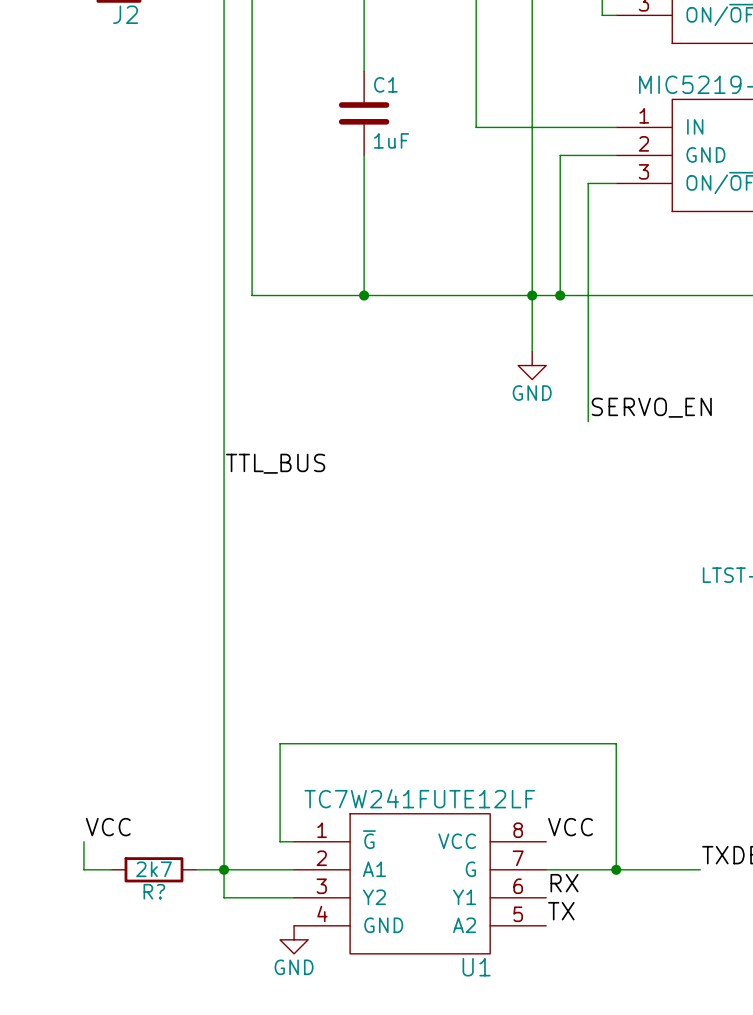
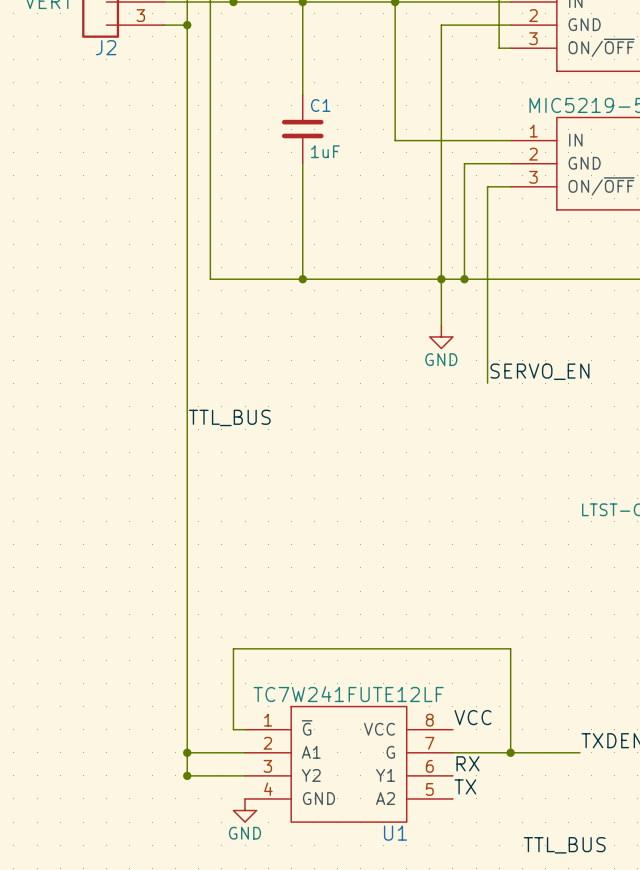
label: VCC (108, 827) -> none
wire: (83, 841) (83, 869) (111, 869) -> none
R?: 2k7 (154, 869) -> none
wire: (196, 869) (224, 869) -> none
junction: none -> (187, 775)
label: none -> TTL_BUS (564, 845)

